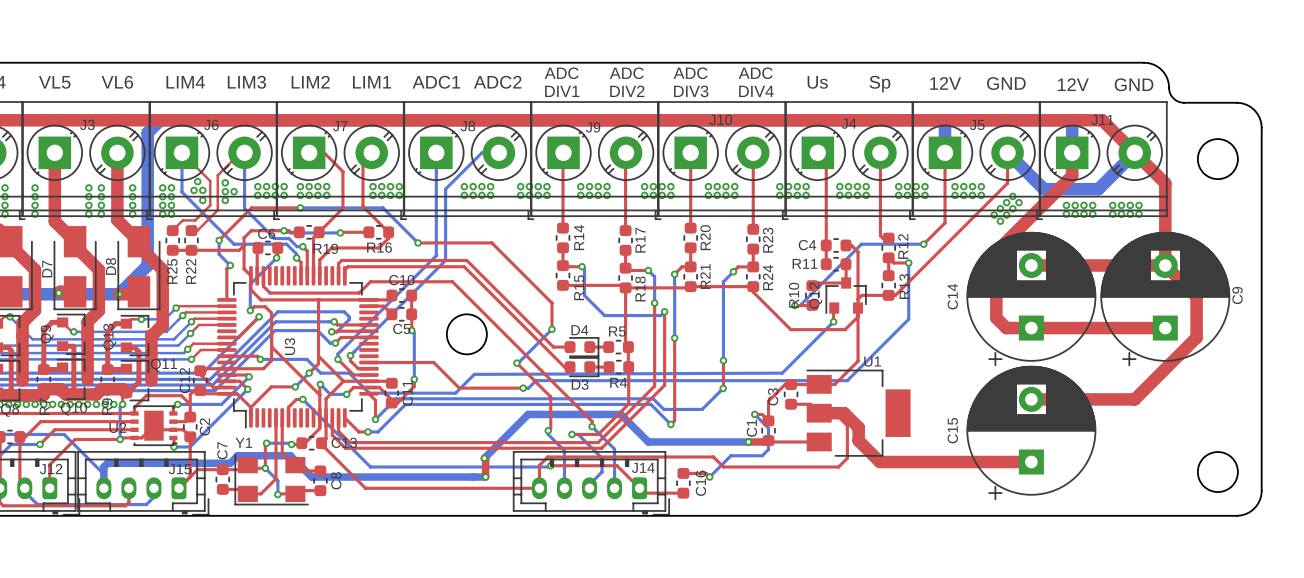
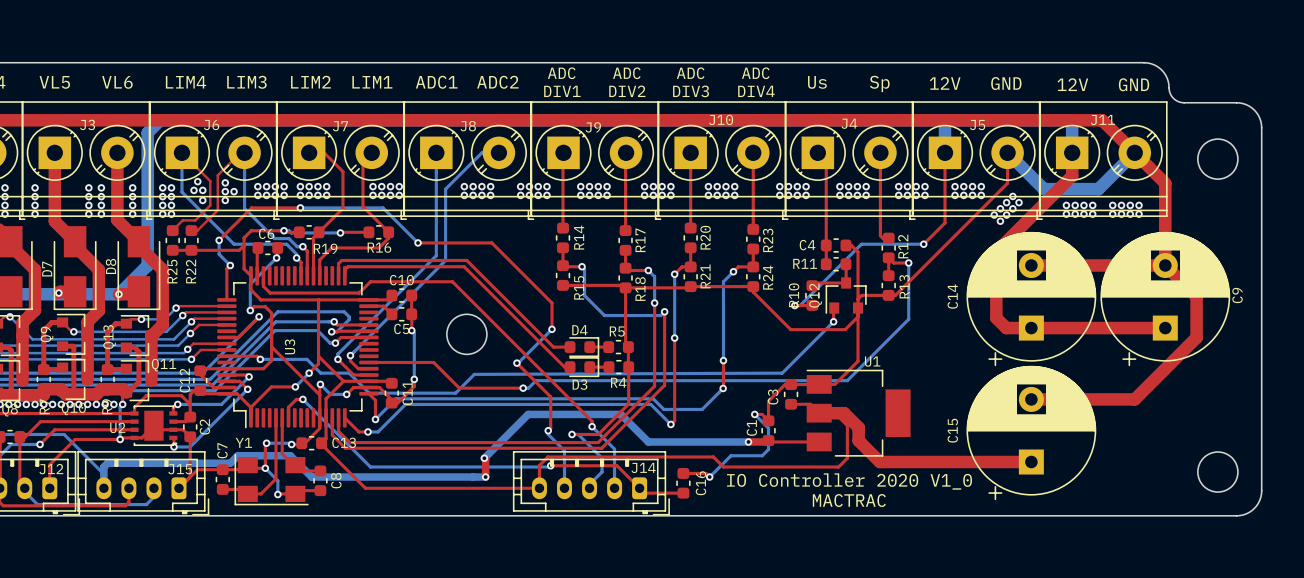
text: none -> IO Controller 2020 V1_0 (849, 481)
text: none -> MACTRAC (849, 500)

